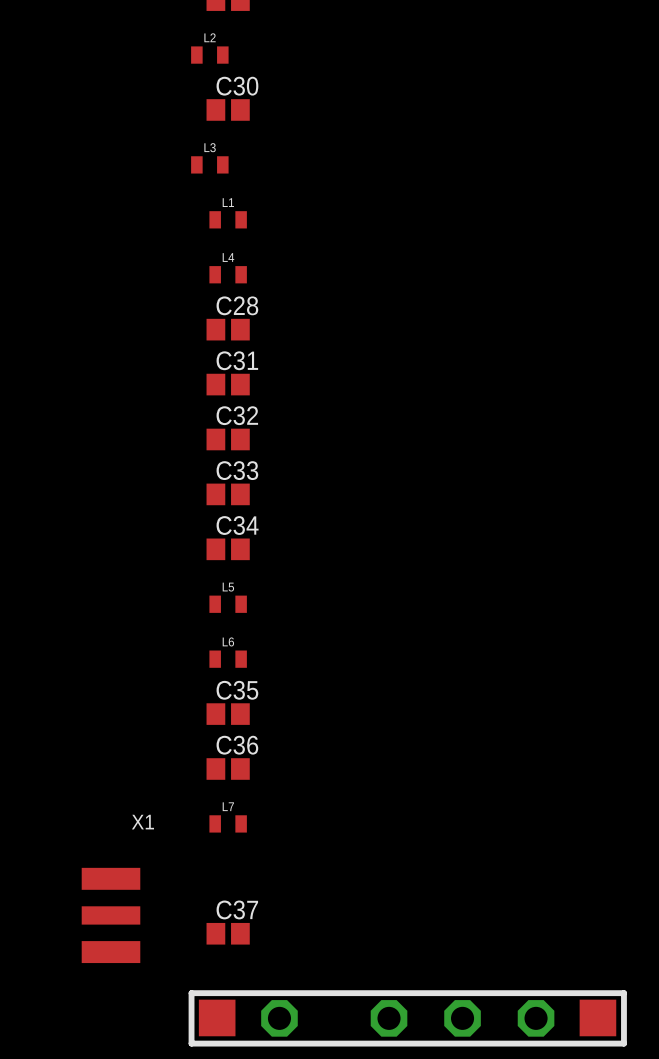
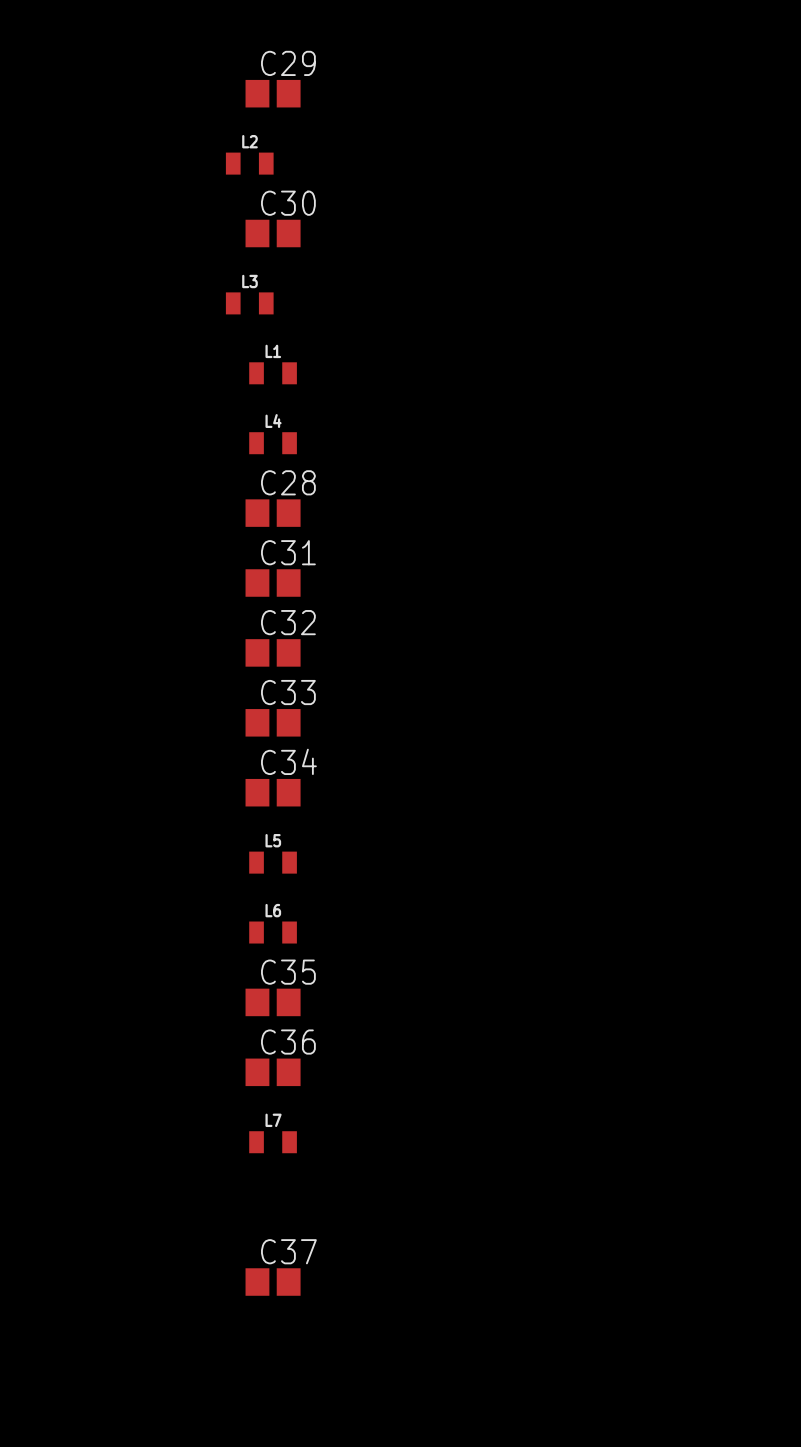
X1: (110, 915) -> none
part: (407, 1018) -> none

